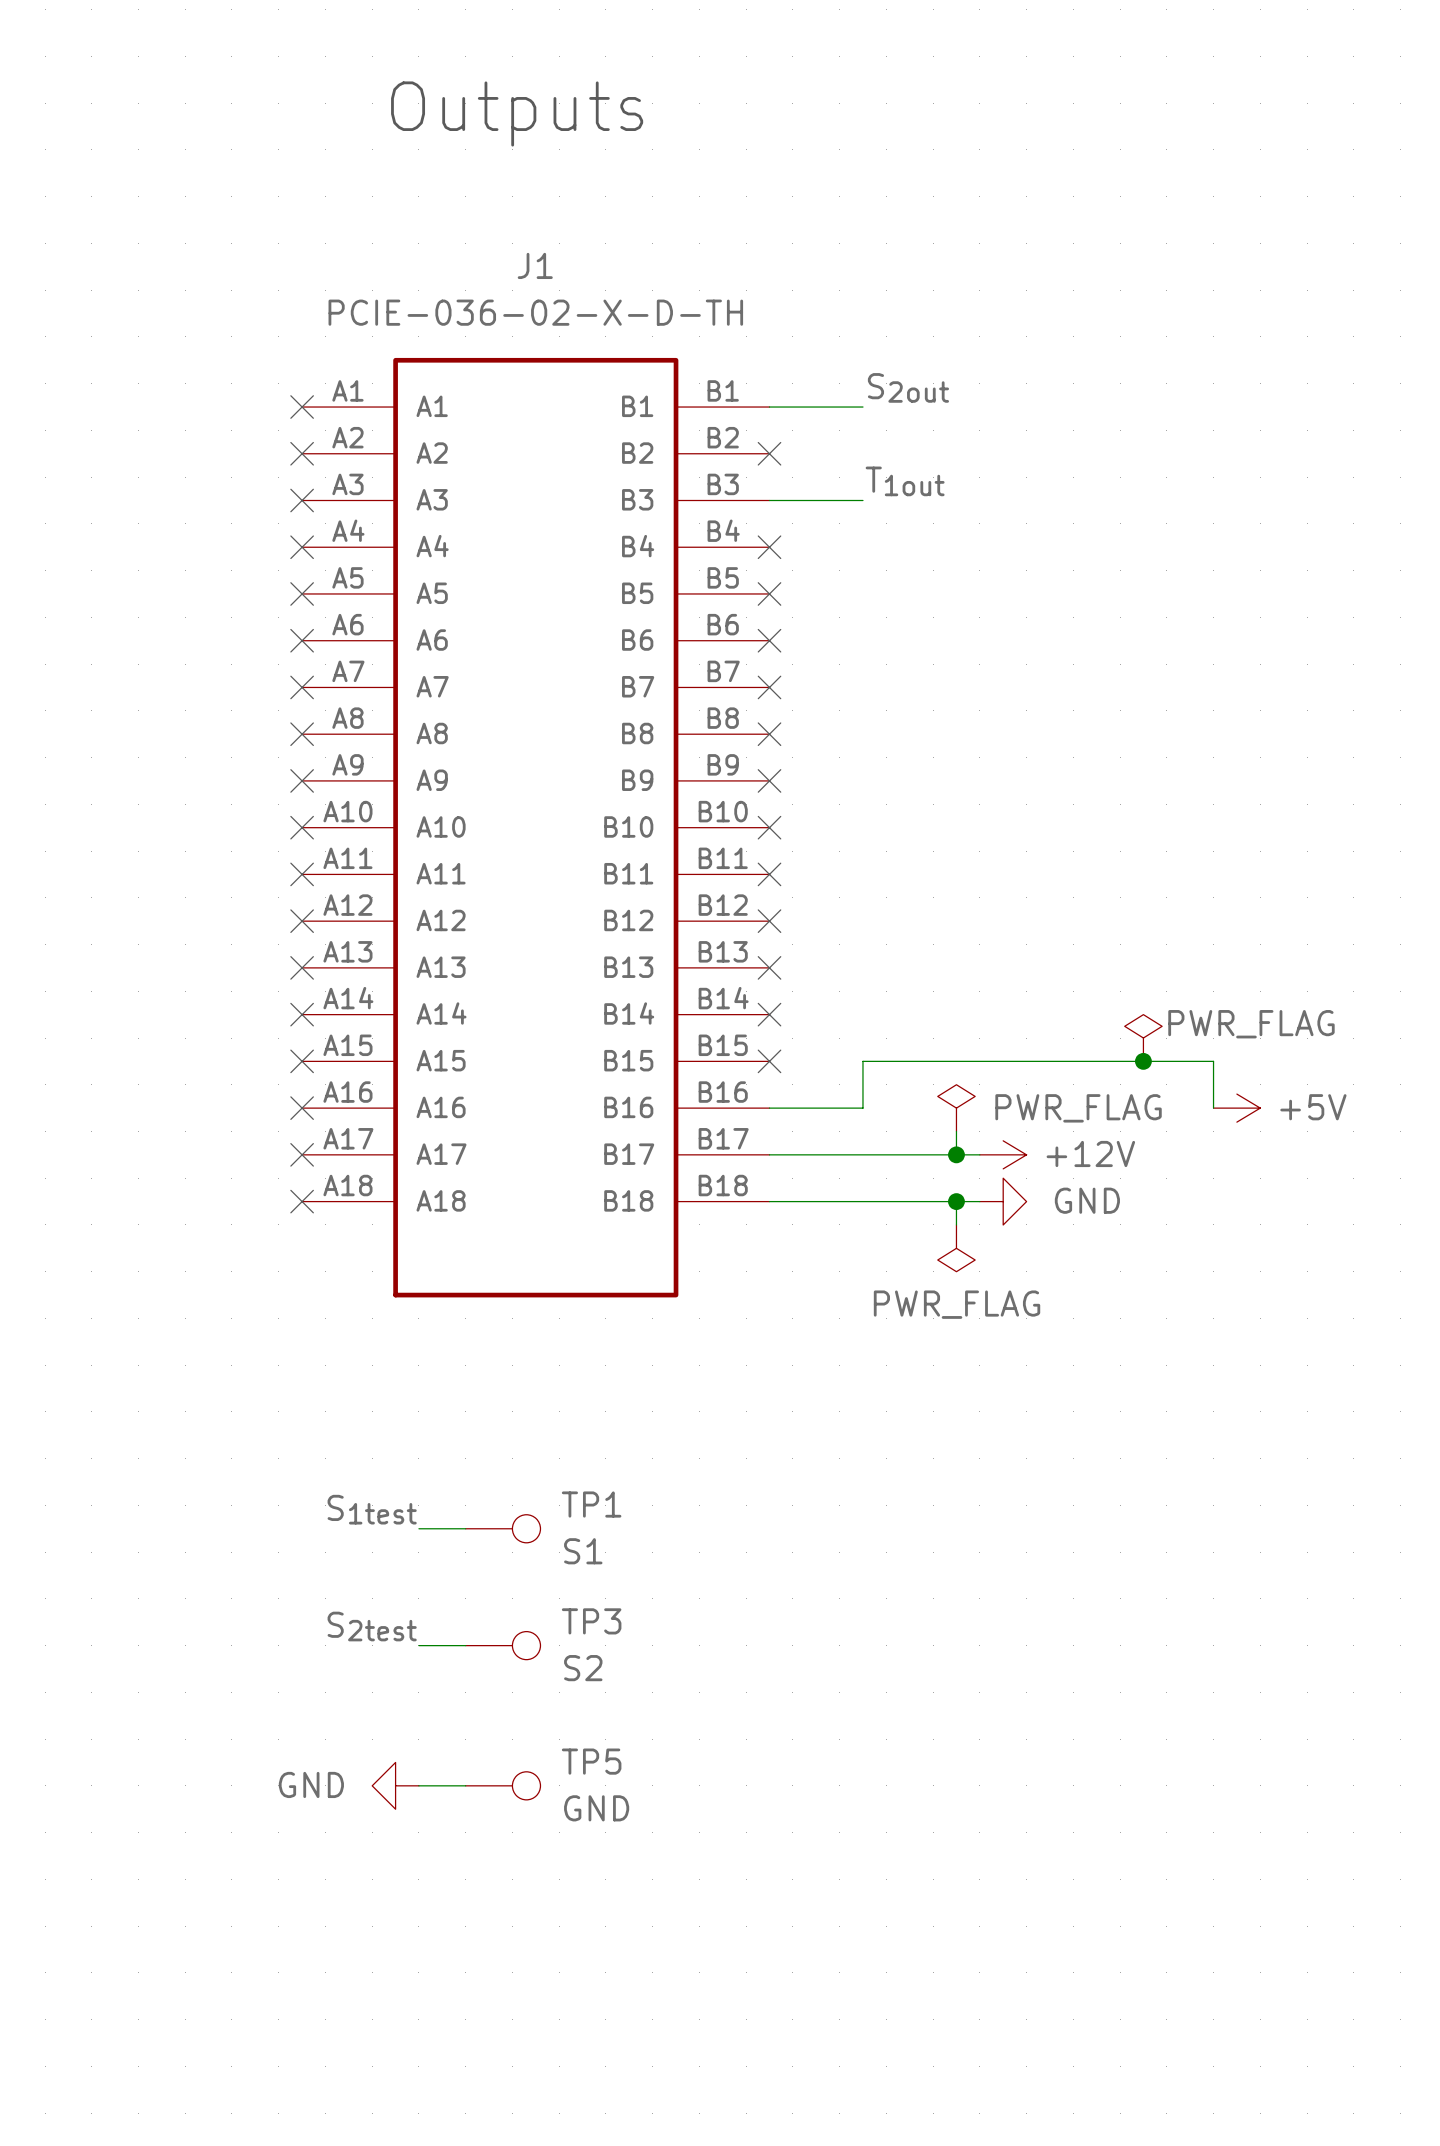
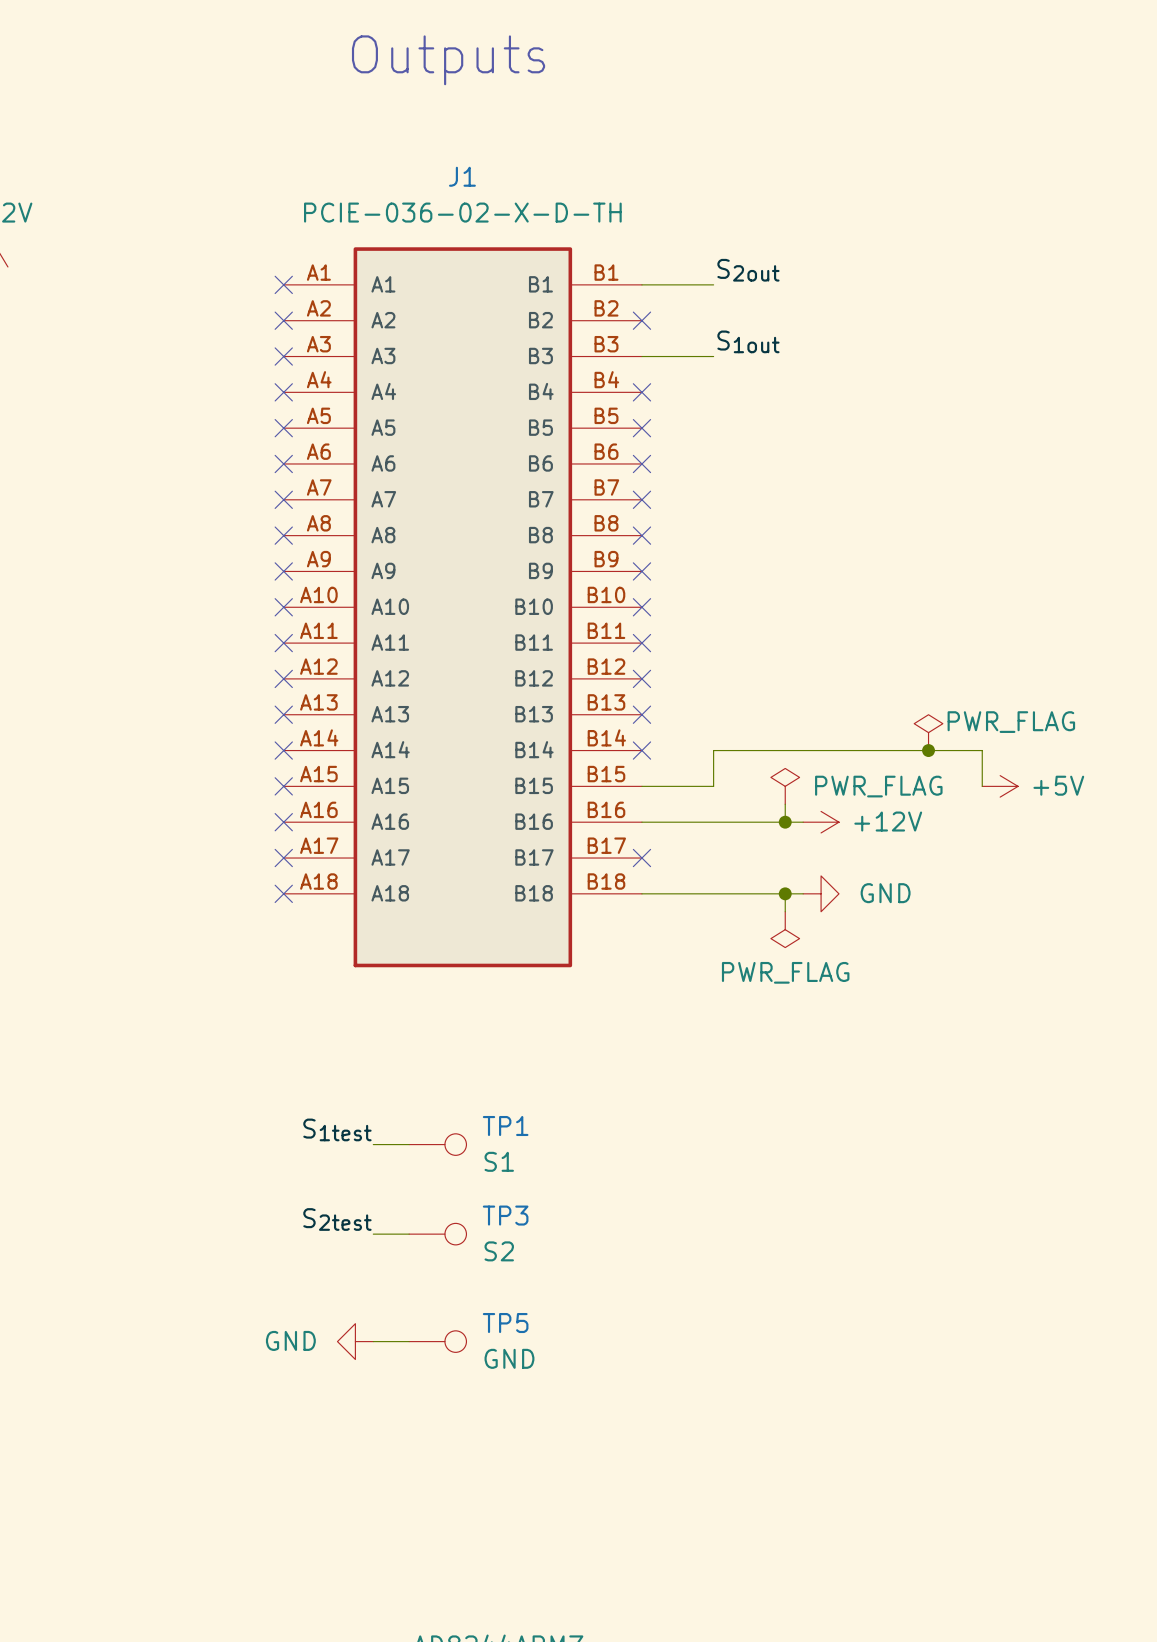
label: T1out (905, 481) -> S1out (748, 341)
power symbol position: PWR_FLAG (1143, 1038) -> PWR_FLAG (928, 732)
wire: none -> (641, 786) (713, 786) (713, 750) (982, 750) (982, 786)
no-connect mark position: (769, 1061) -> (641, 858)
junction position: (1143, 1061) -> (928, 750)
wire: (862, 1108) (862, 1061) (1213, 1061) (1213, 1108) -> (713, 822) (803, 822)
power symbol position: PWR_FLAG (956, 1108) -> PWR_FLAG (785, 786)
power symbol position: +5V (1236, 1108) -> +5V (1000, 786)
wire: (956, 1131) (956, 1154) -> (785, 804) (785, 822)
wire: (769, 1154) (979, 1154) -> none
junction position: (956, 1154) -> (785, 822)
power symbol position: +12V (1003, 1154) -> +12V (821, 822)

